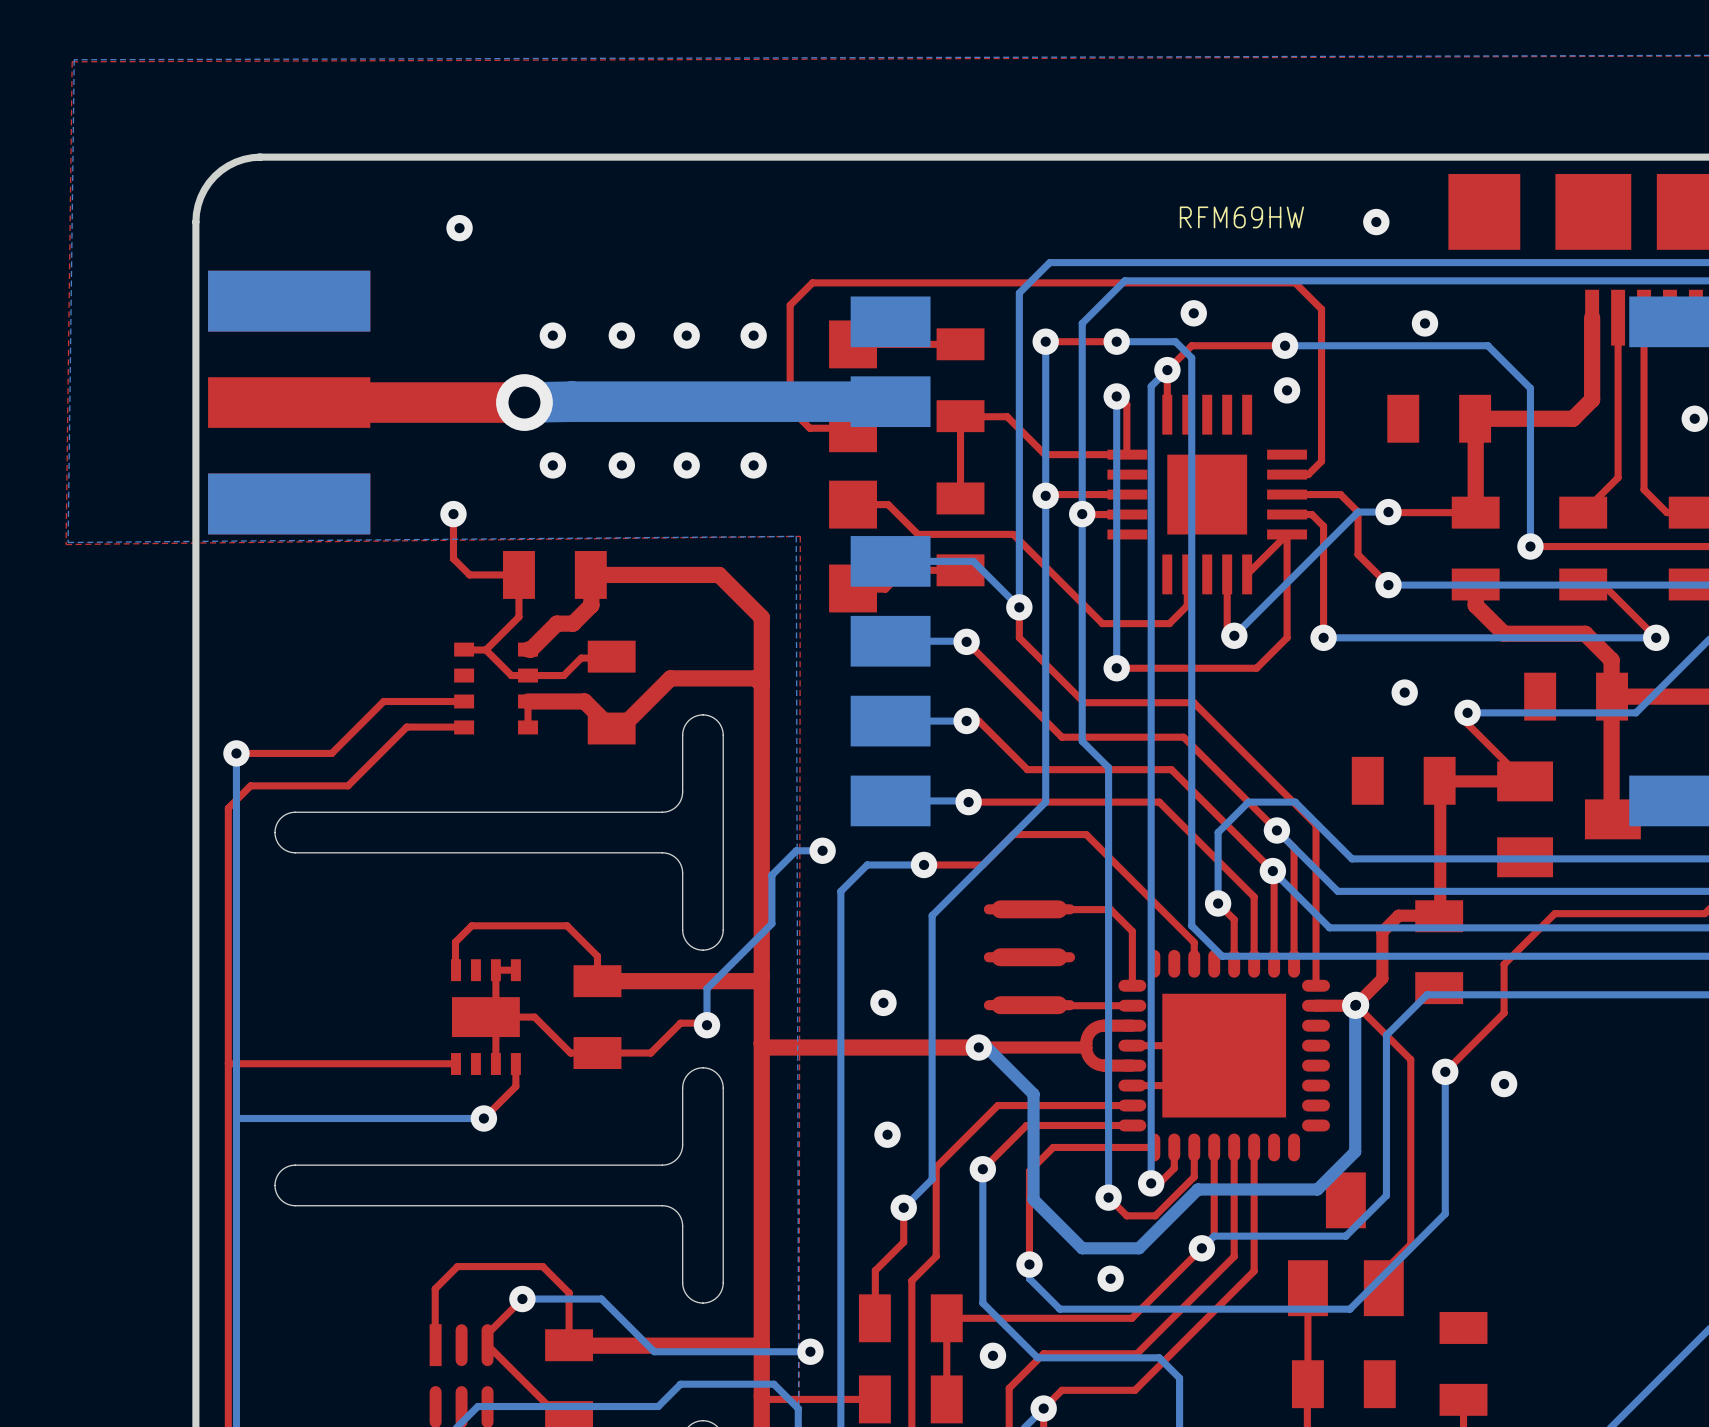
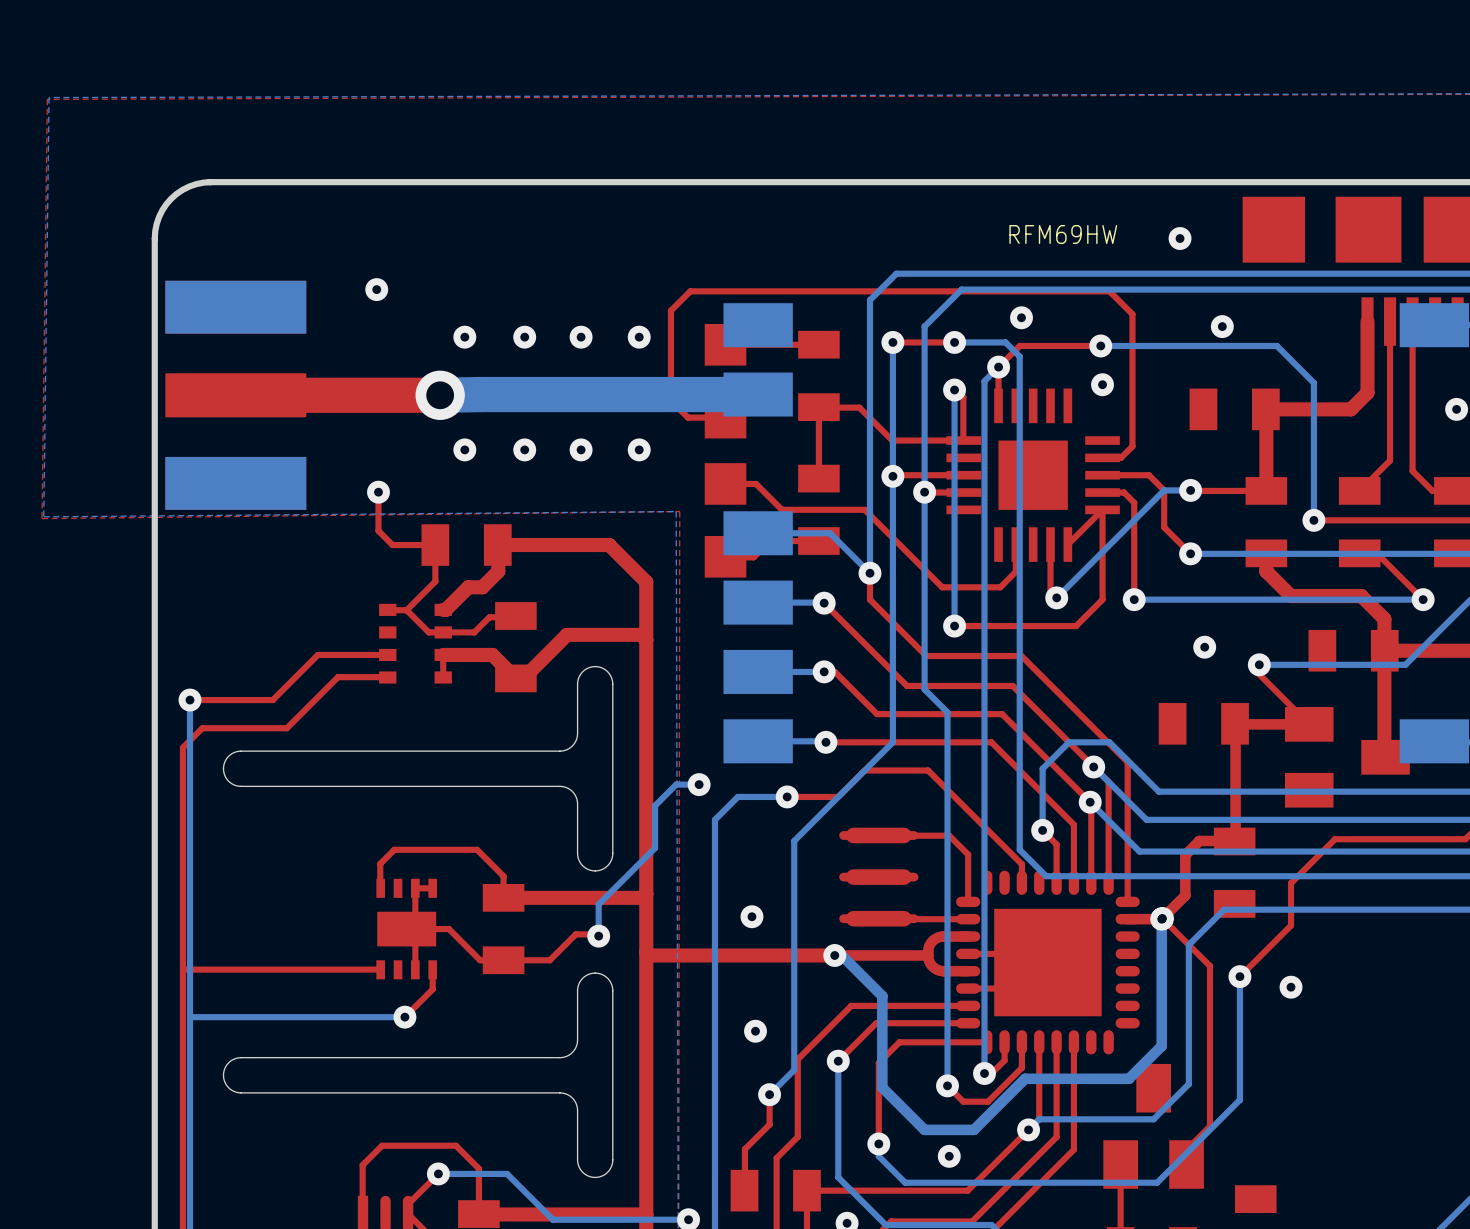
via position: (459, 228) -> (376, 289)

